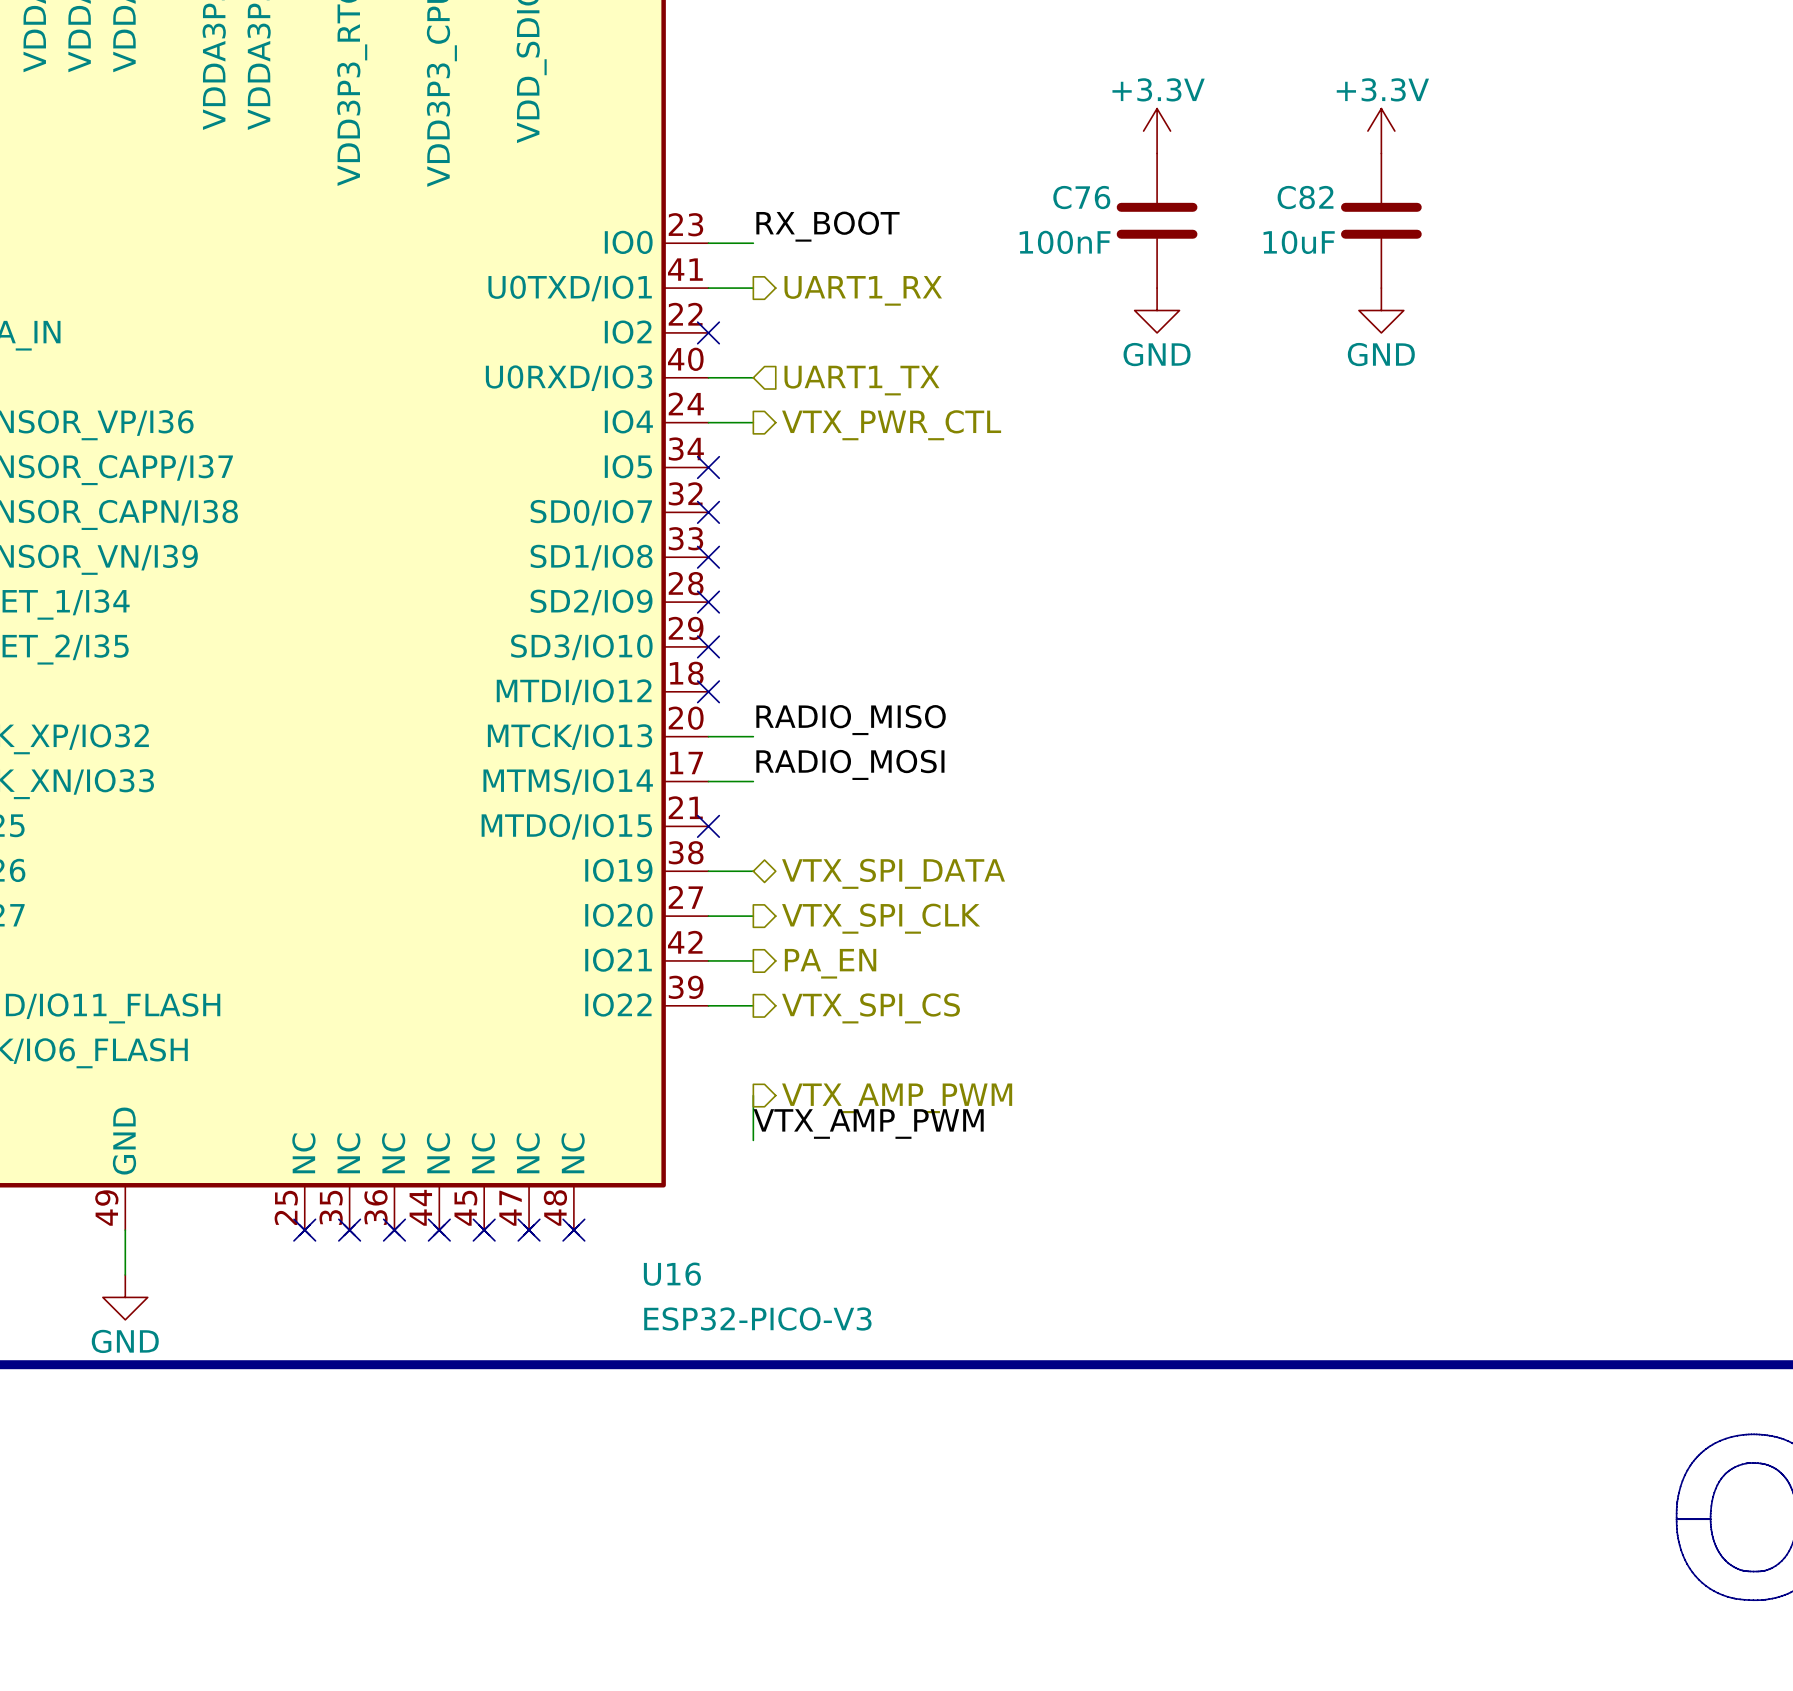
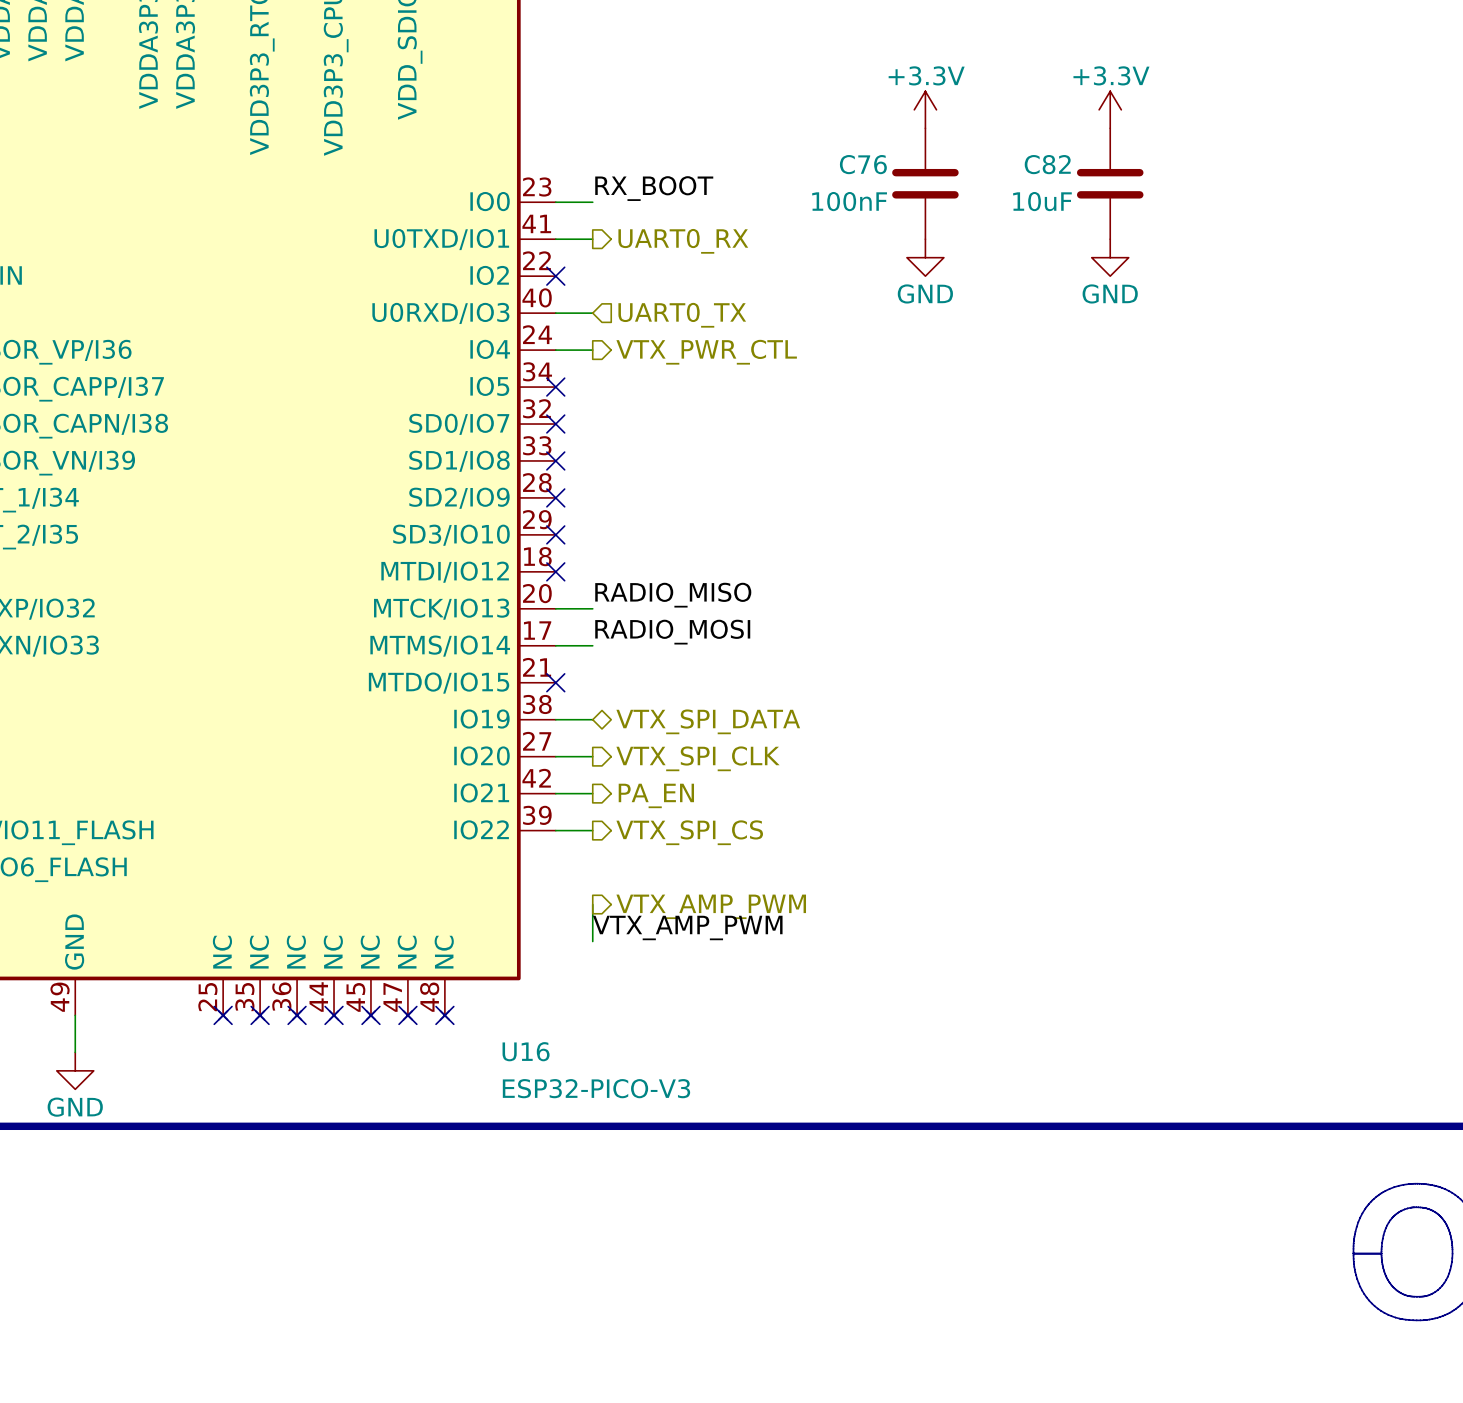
hierarchical label: UART1_RX (863, 290) -> UART0_RX (683, 241)
hierarchical label: UART1_TX (861, 380) -> UART0_TX (682, 315)

